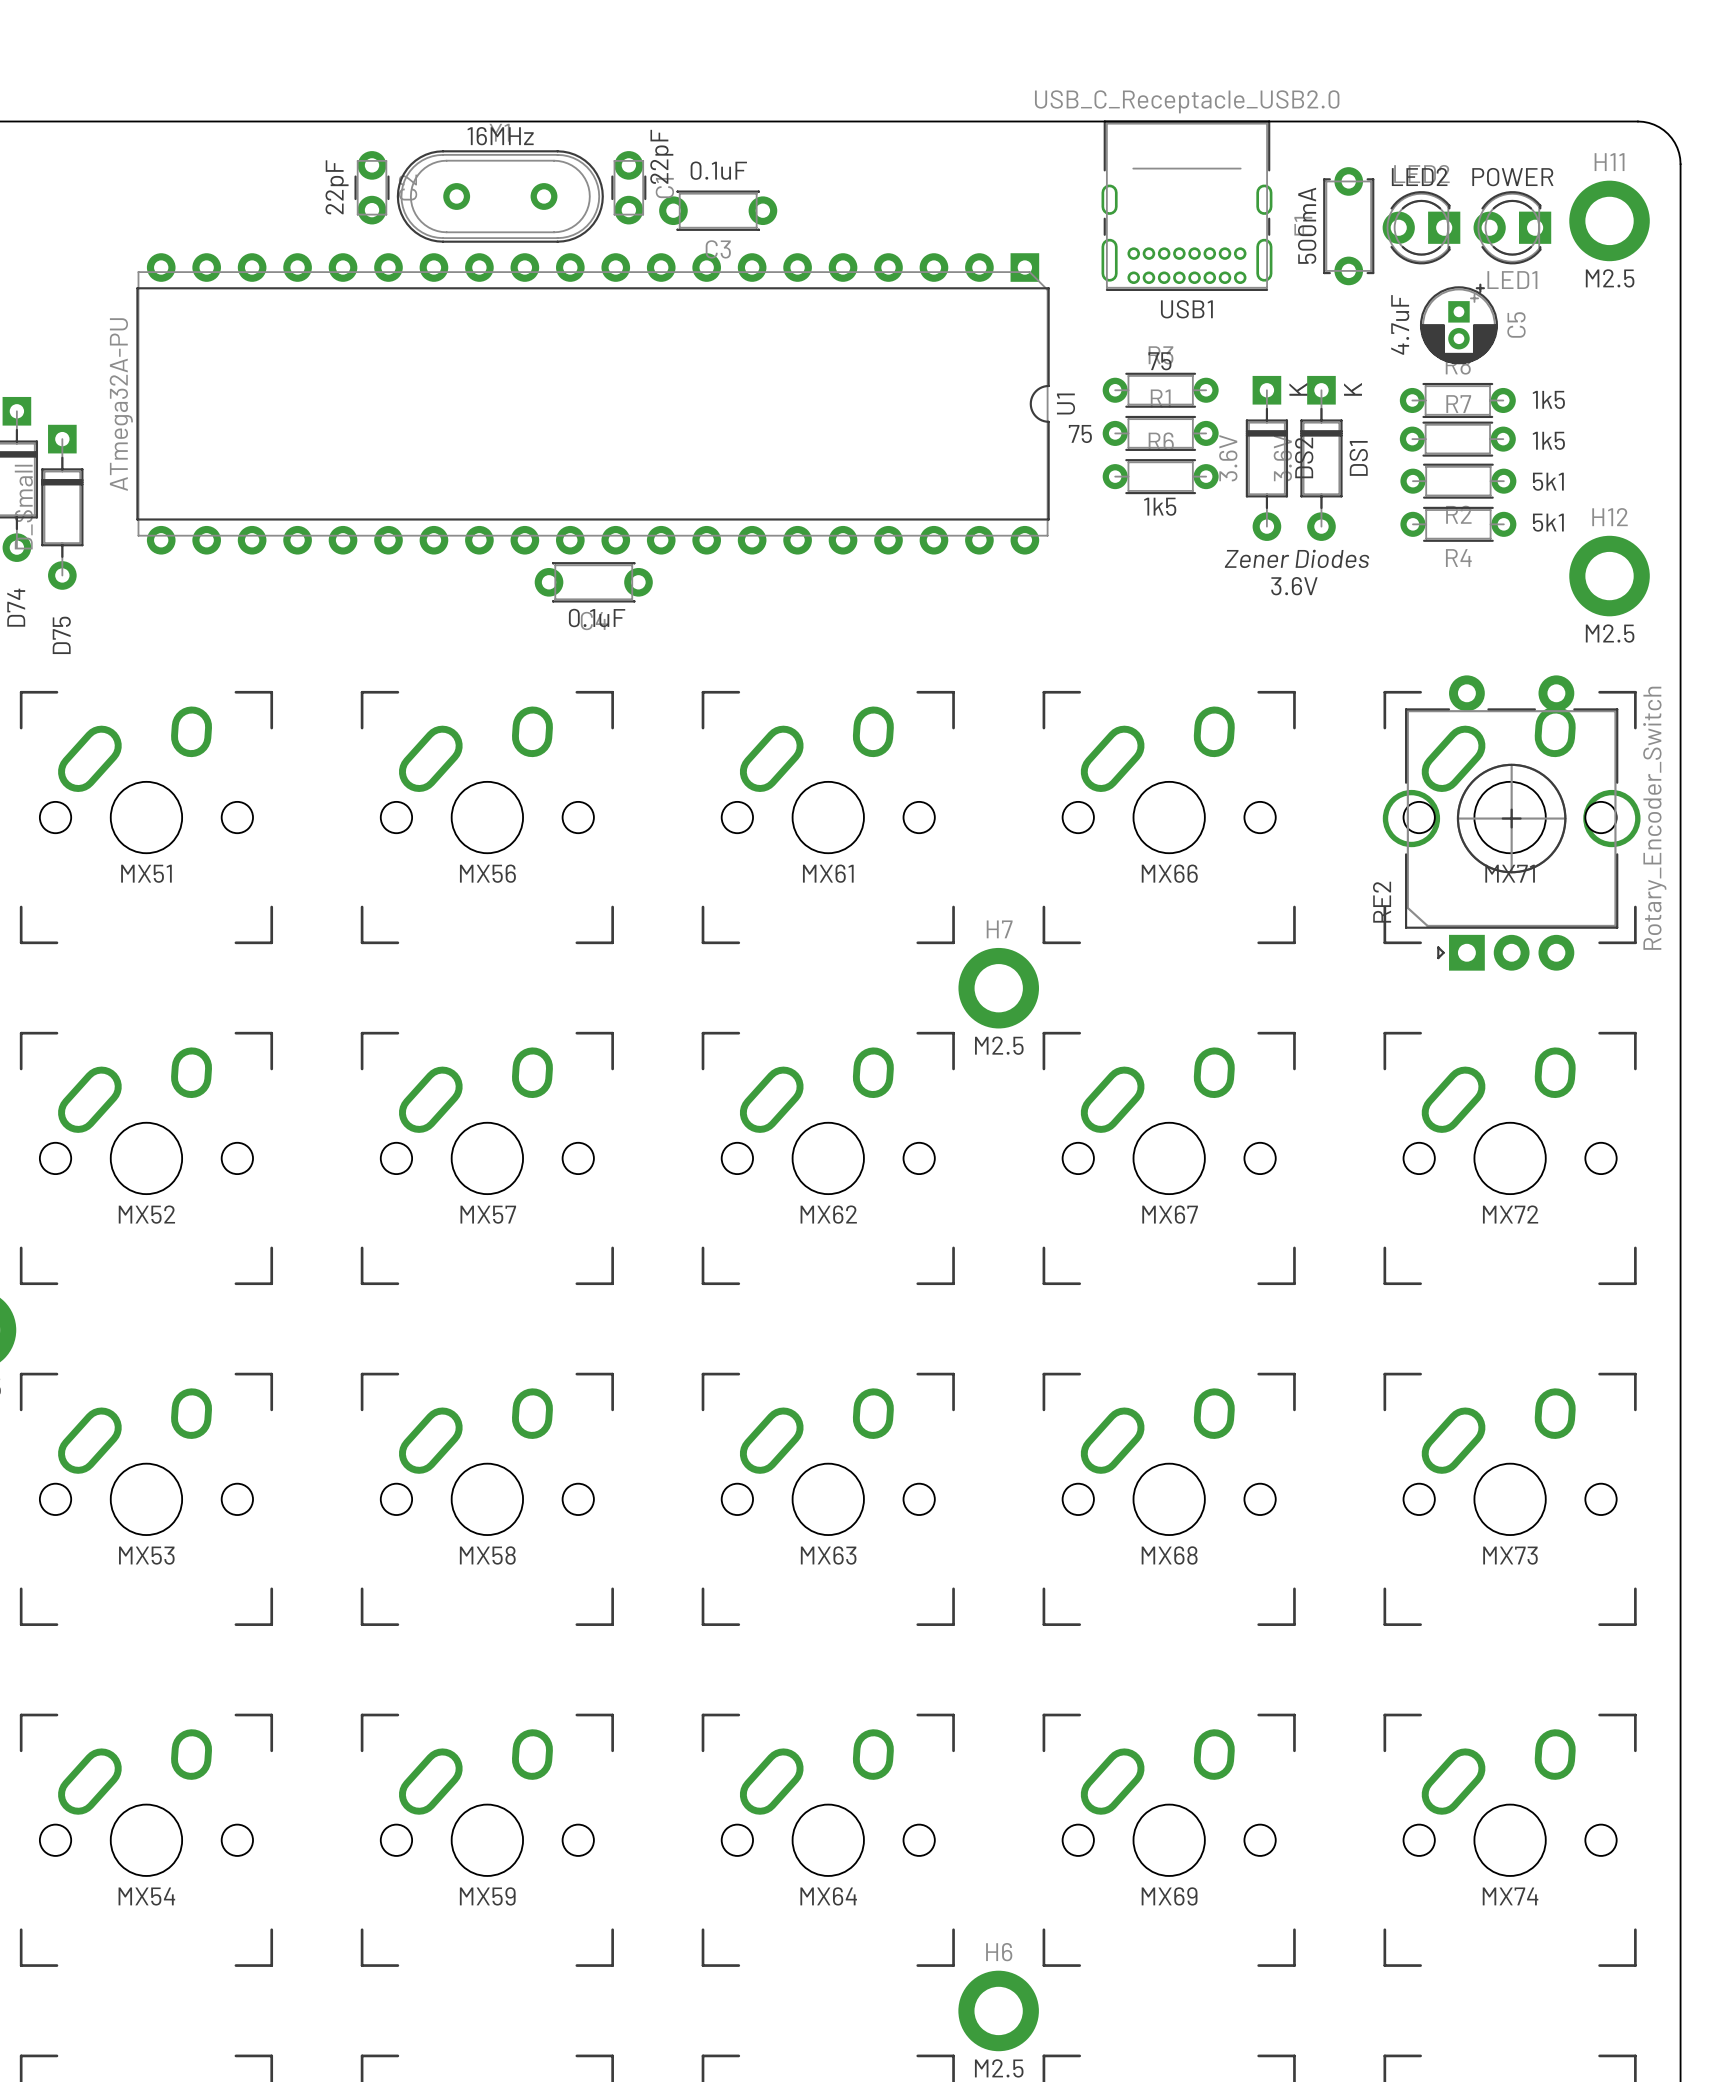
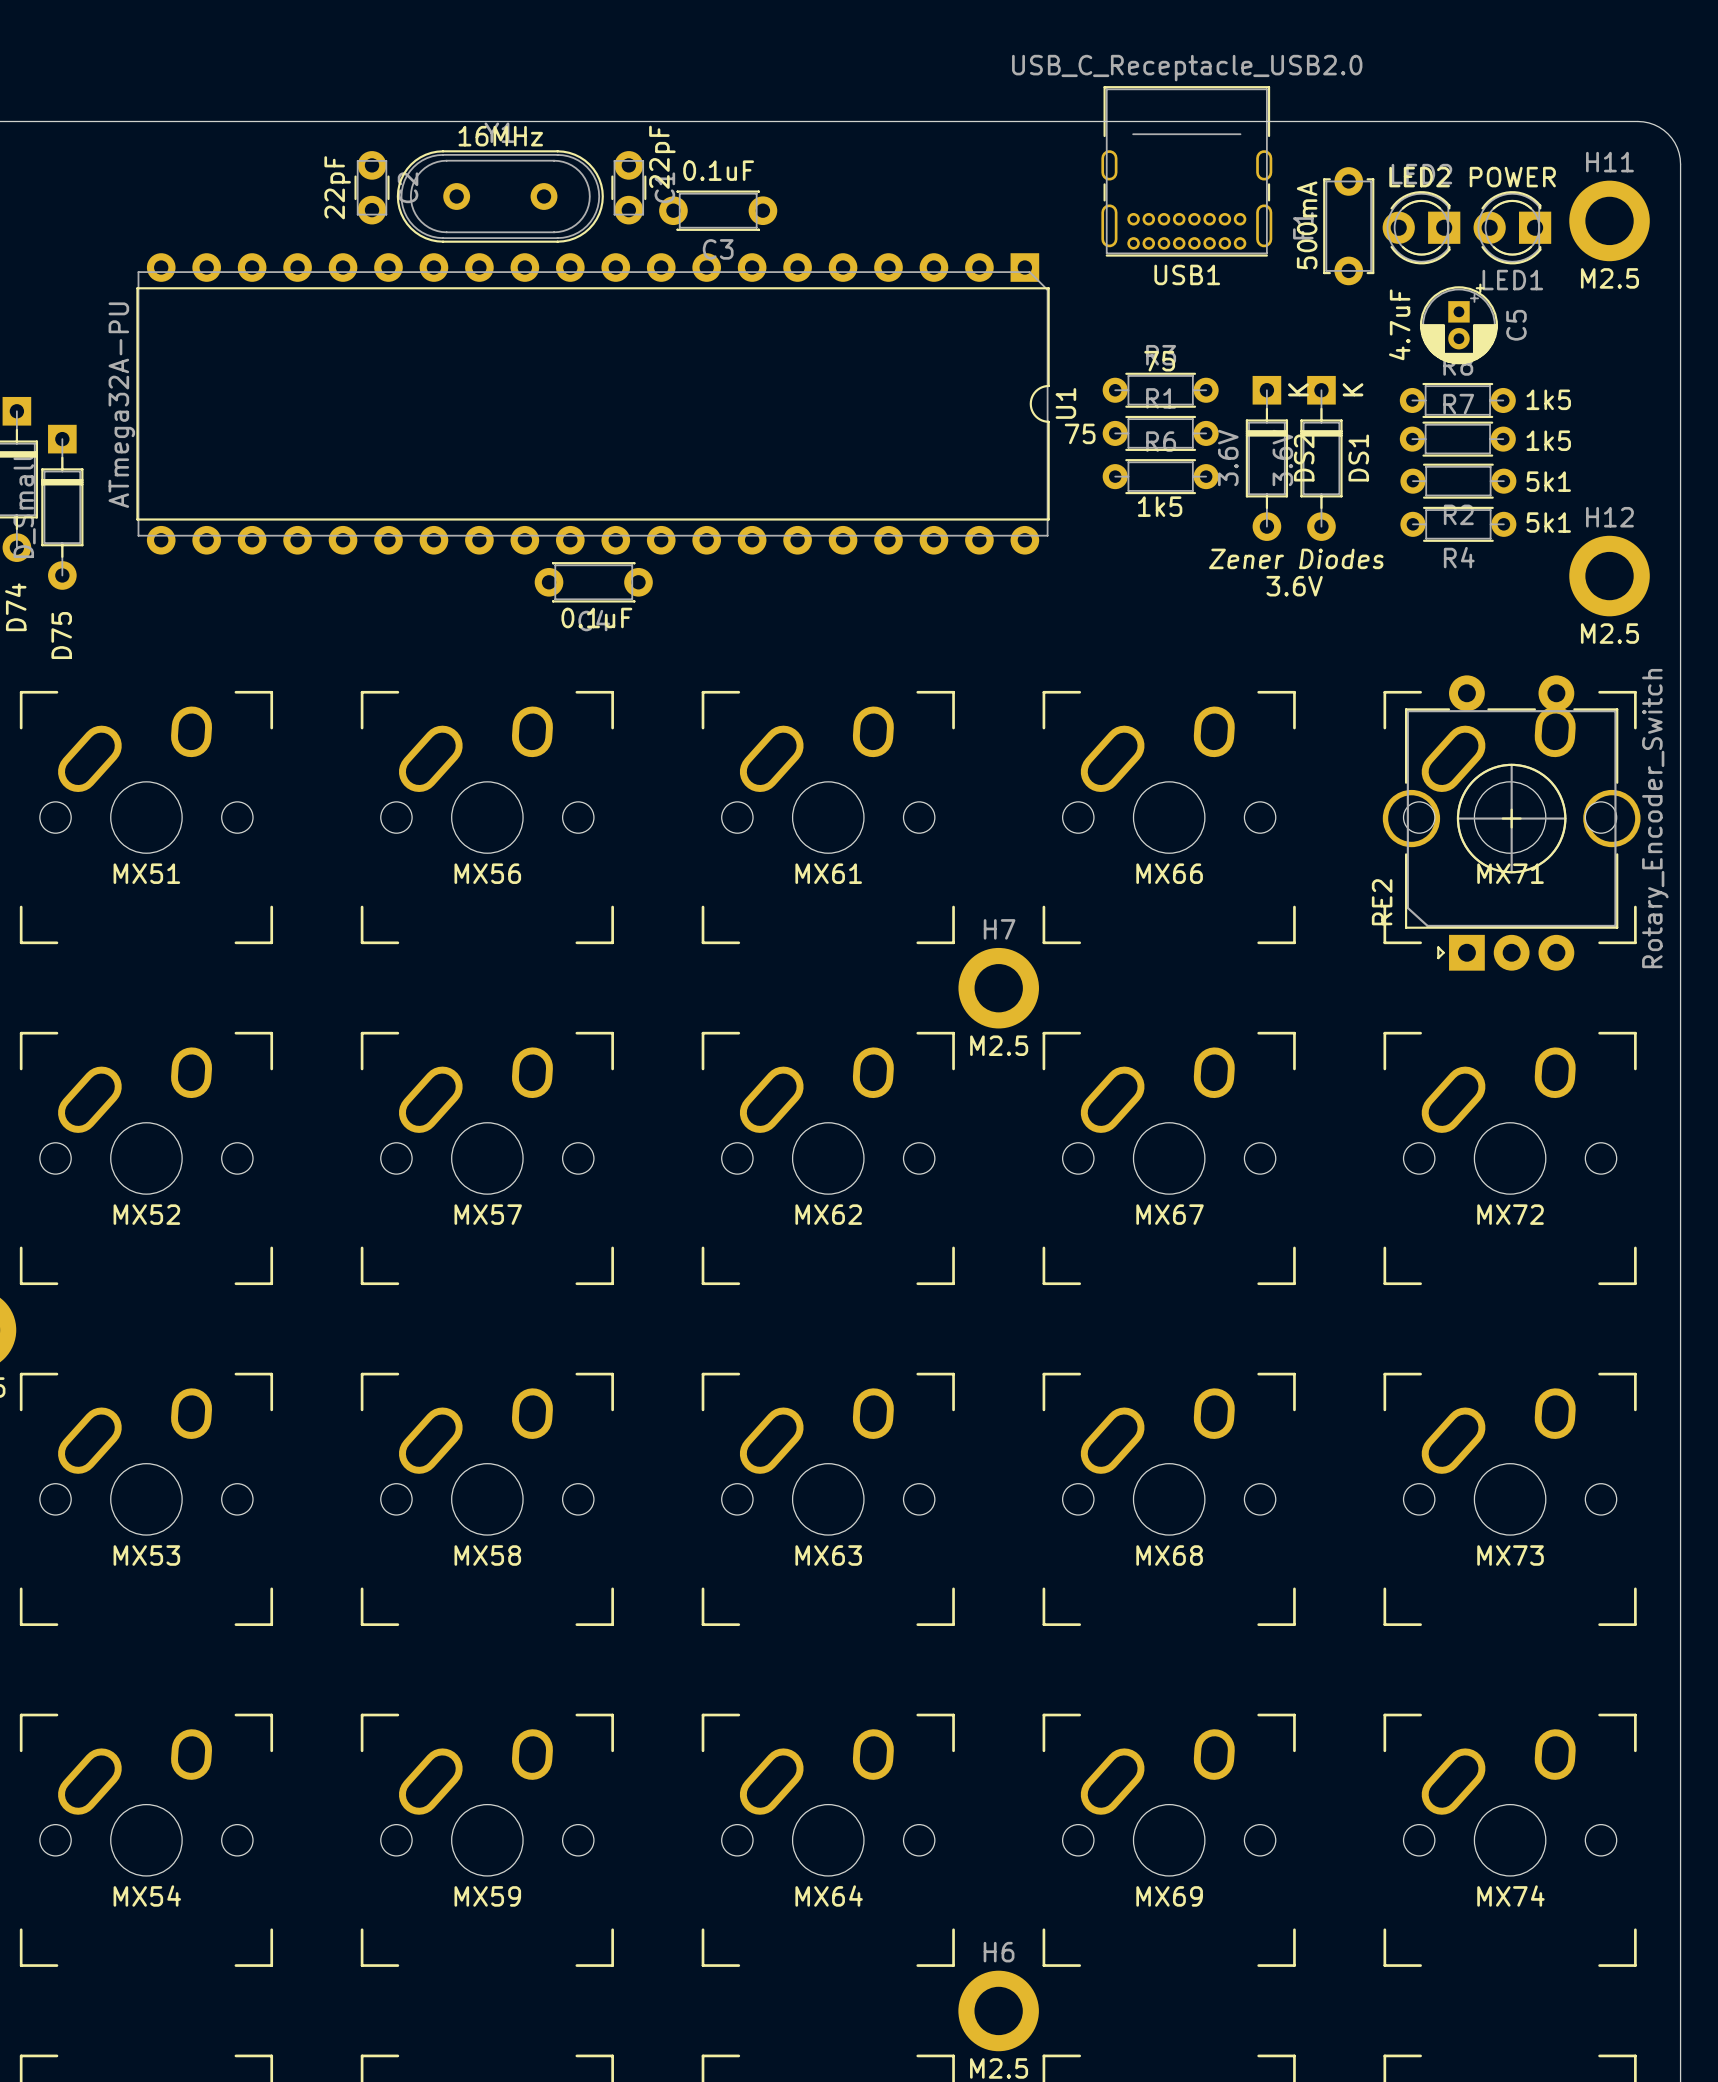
USB1 position: (1186, 205) -> (1186, 171)

